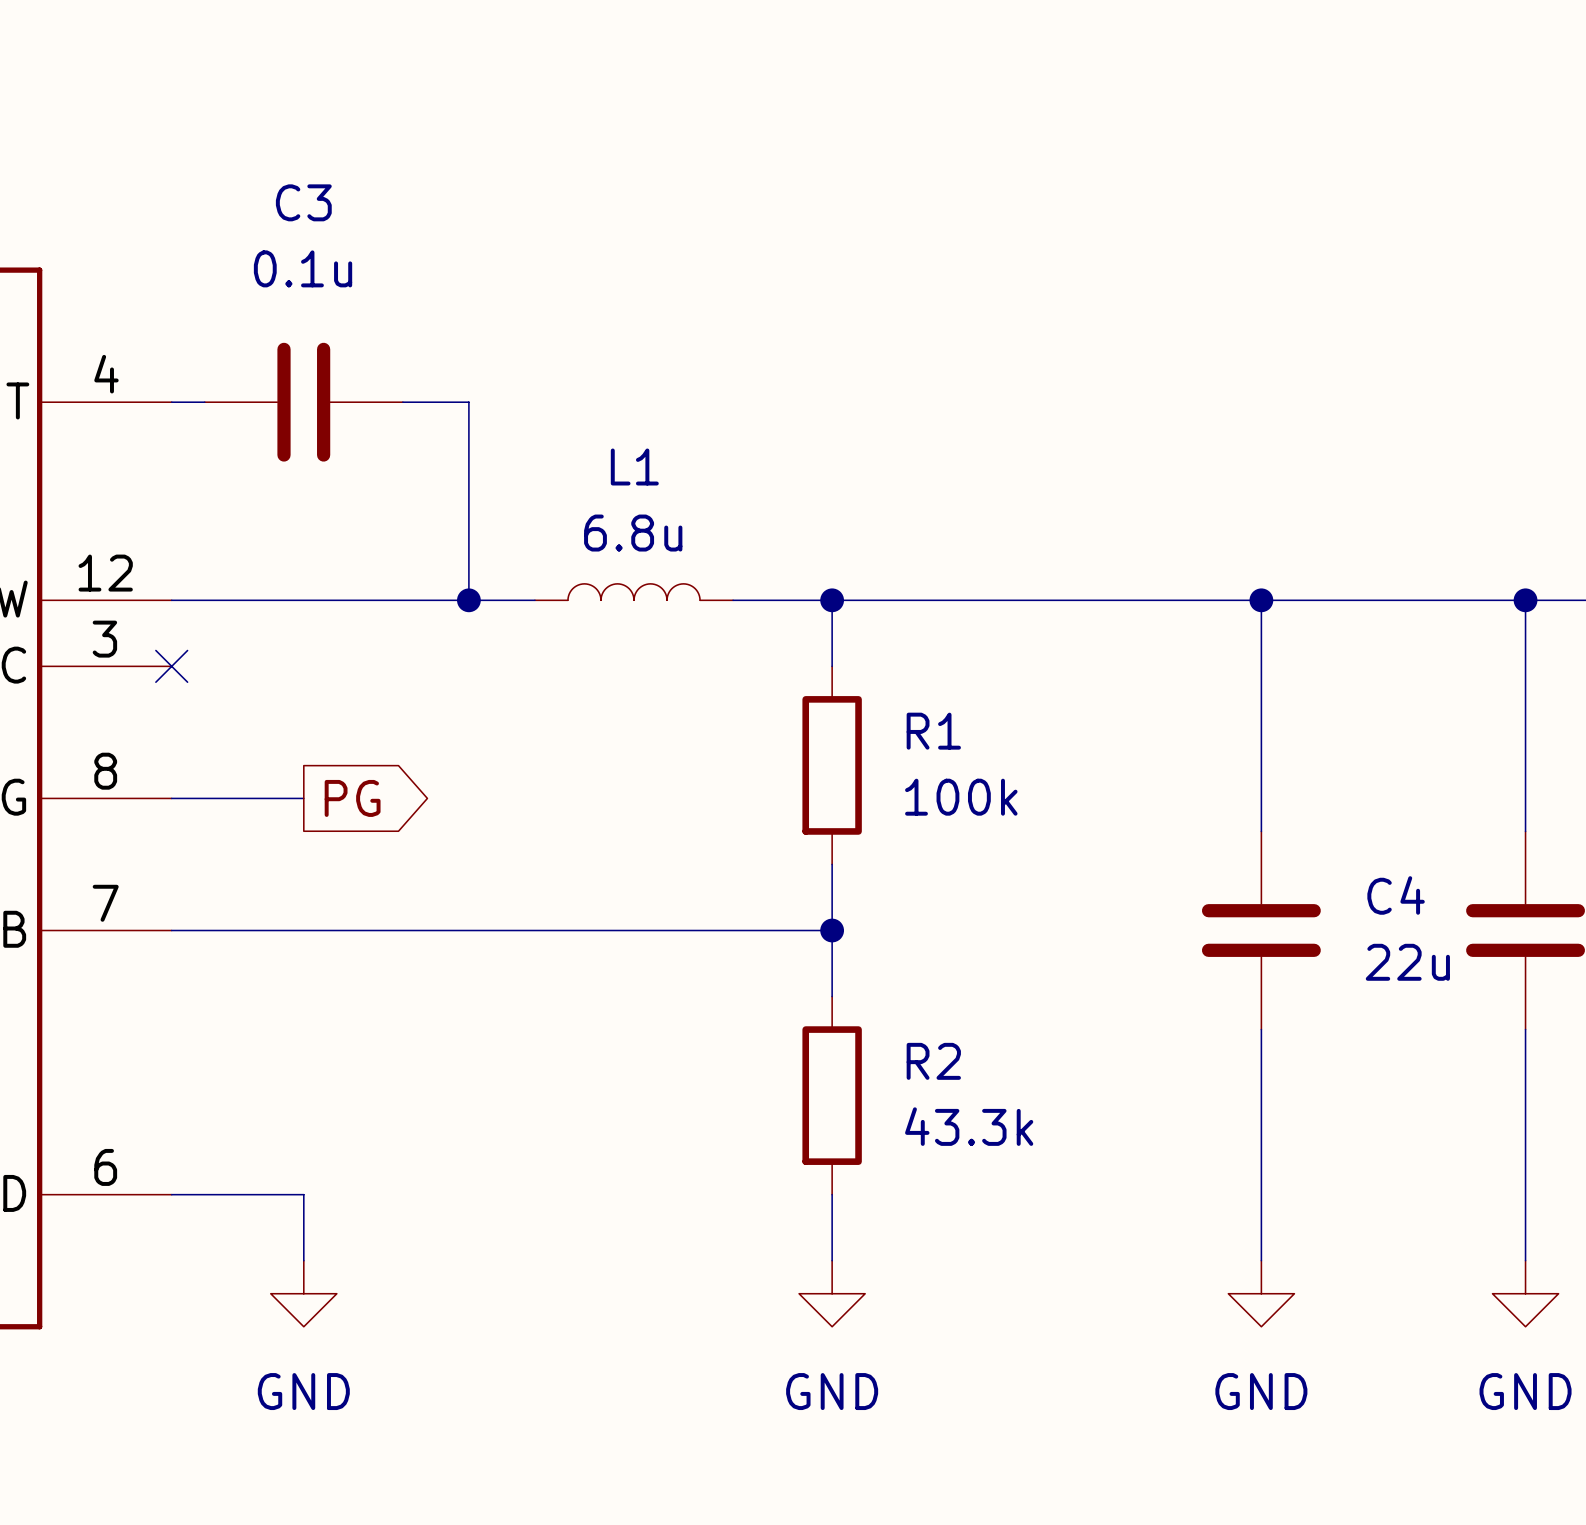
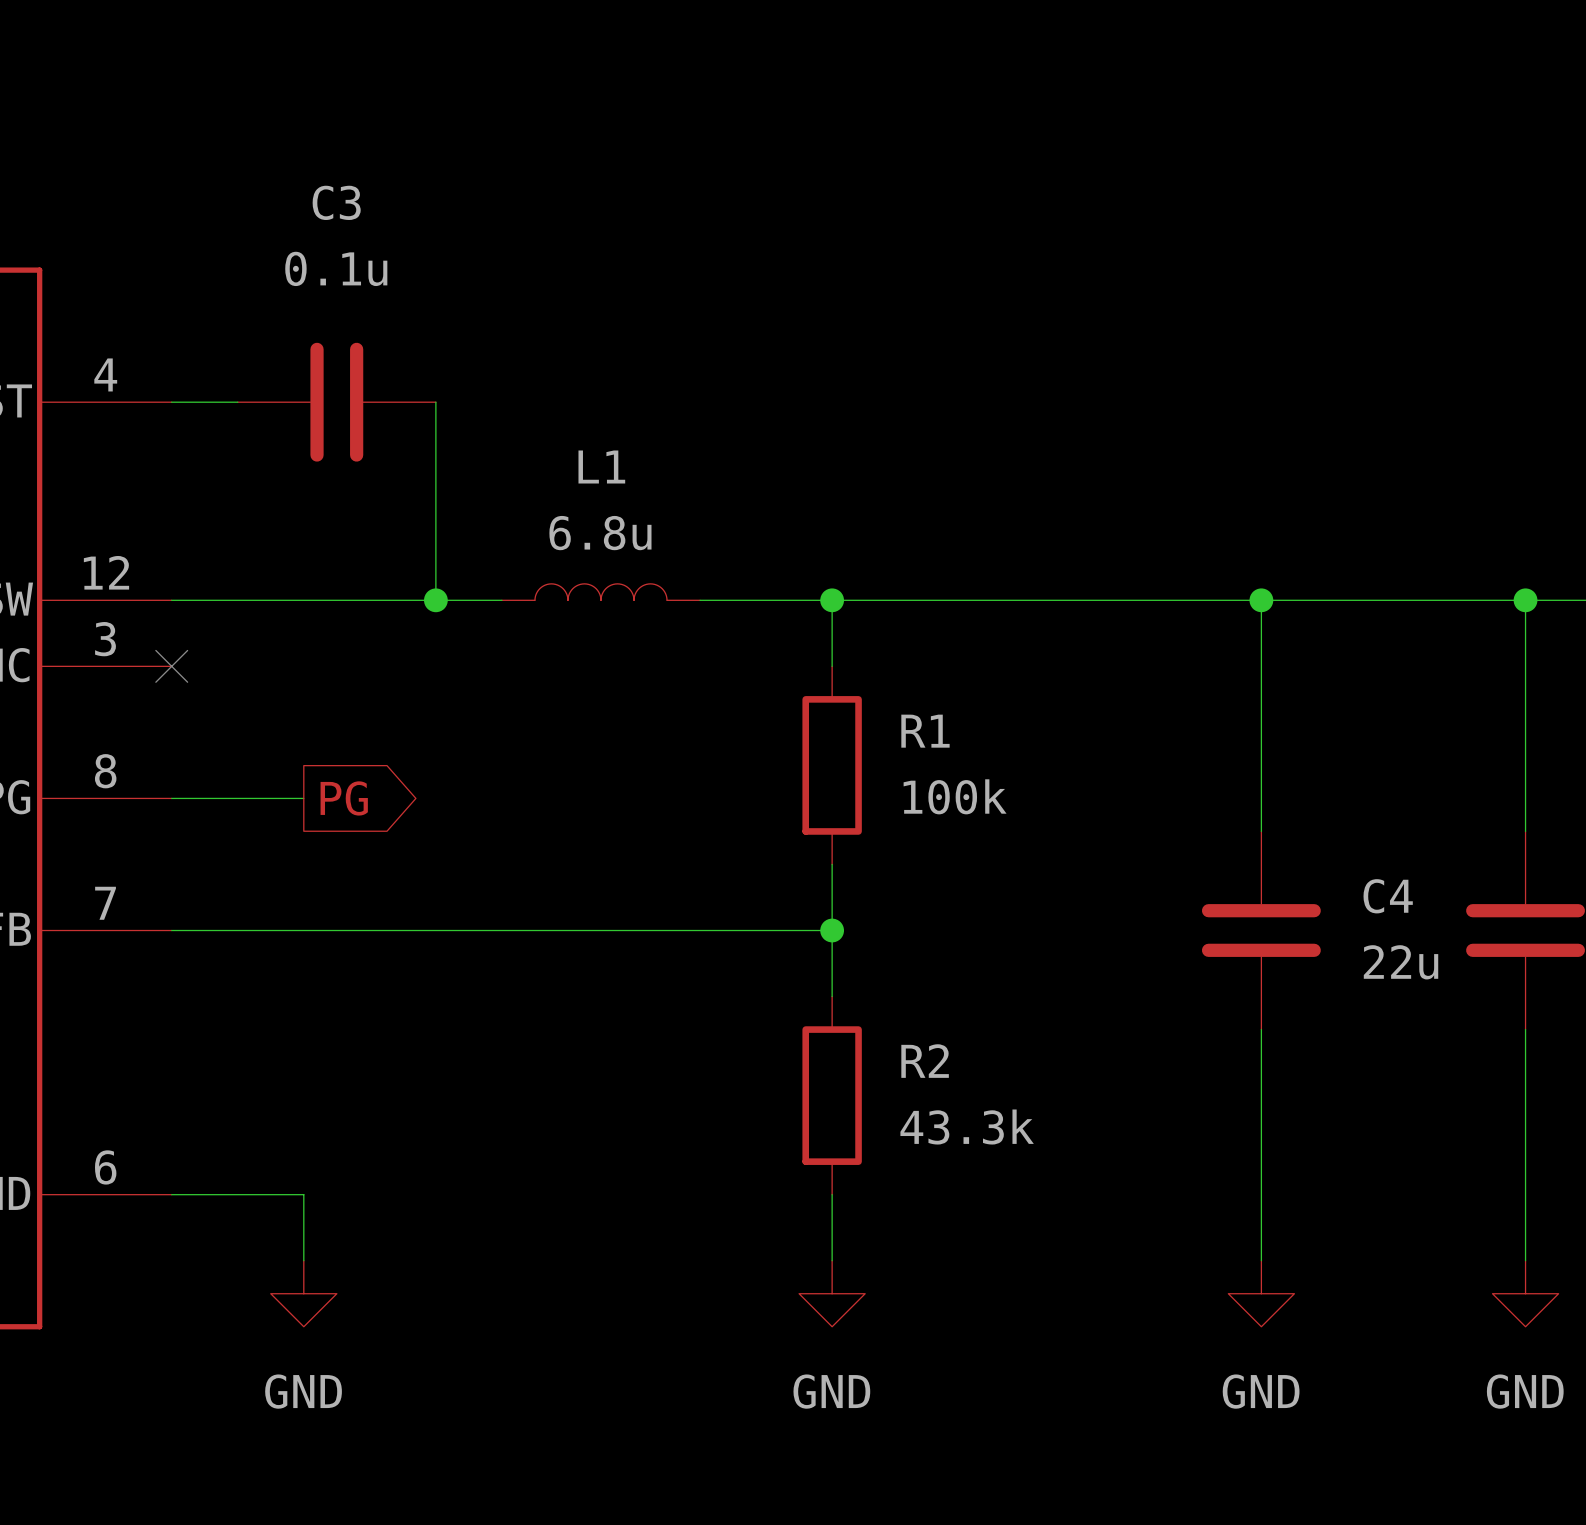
C3 position: (303, 402) -> (336, 402)
wire: (402, 402) (468, 402) (468, 600) -> none
wire: none -> (435, 402) (435, 600)
L1 position: (634, 592) -> (600, 592)
junction position: (468, 600) -> (435, 600)

